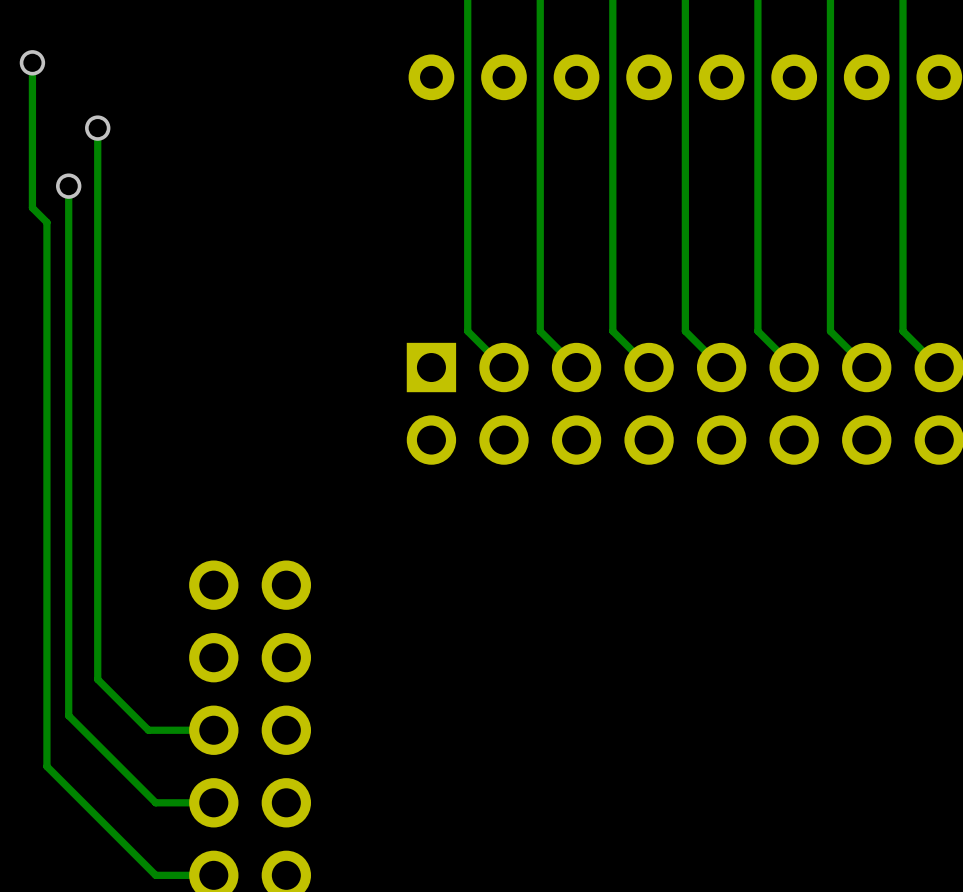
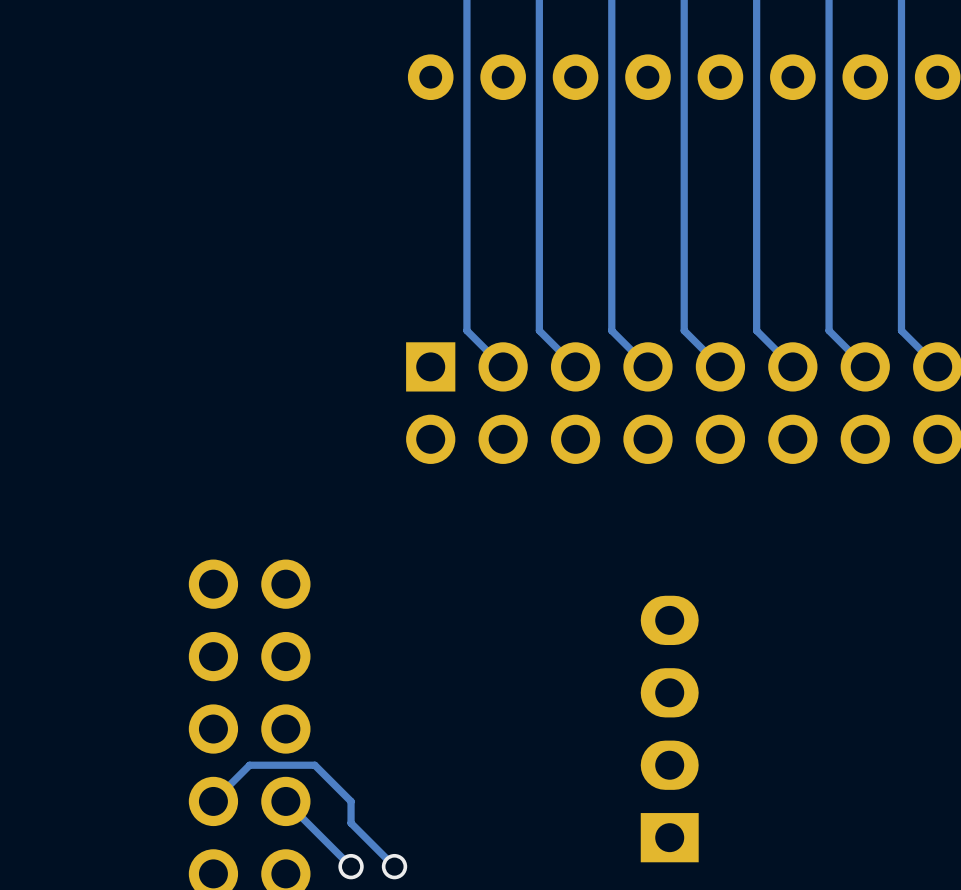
track: (32, 62) (32, 207) (46, 222) (46, 766) (155, 875) (213, 875) -> none
via: (32, 62) -> none
track: (97, 128) (97, 679) (148, 730) (213, 730) -> none
via: (97, 128) -> none
track: (68, 186) (68, 715) (155, 802) (213, 802) -> (394, 866) (351, 823) (351, 801) (314, 765) (249, 765) (213, 801)
via: (68, 186) -> none
part: none -> (669, 729)
track: none -> (285, 801) (351, 866)
via: none -> (351, 866)
via: none -> (394, 866)

